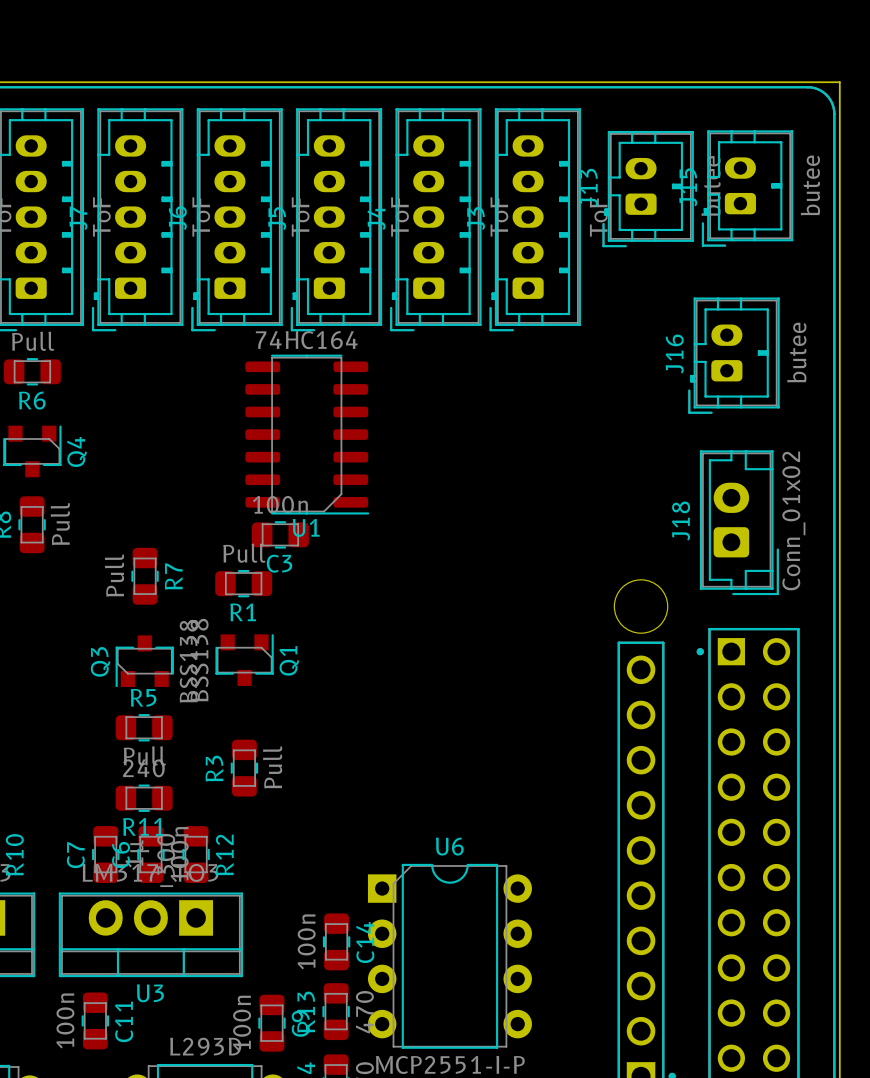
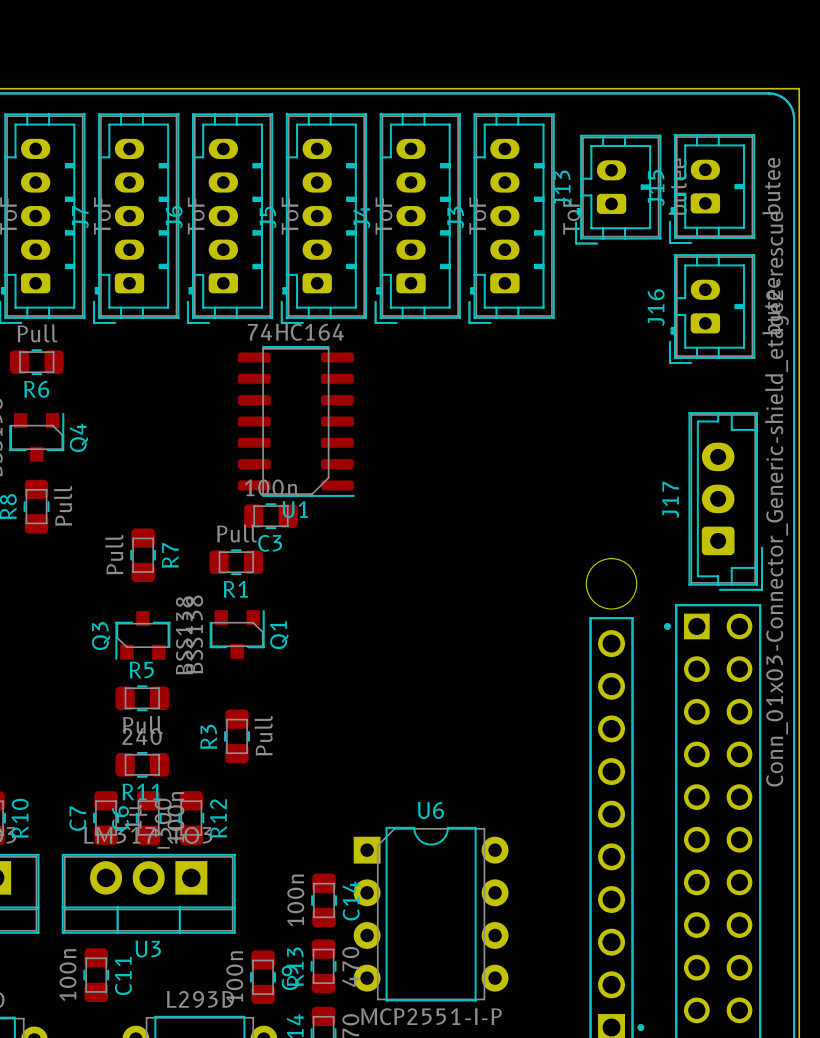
J16 position: (733, 355) -> (712, 309)
J17: none -> Conn_01x03-Connector_Generic-shield_etage2-rescue (725, 501)
J18: Conn_01x02 (739, 522) -> none

